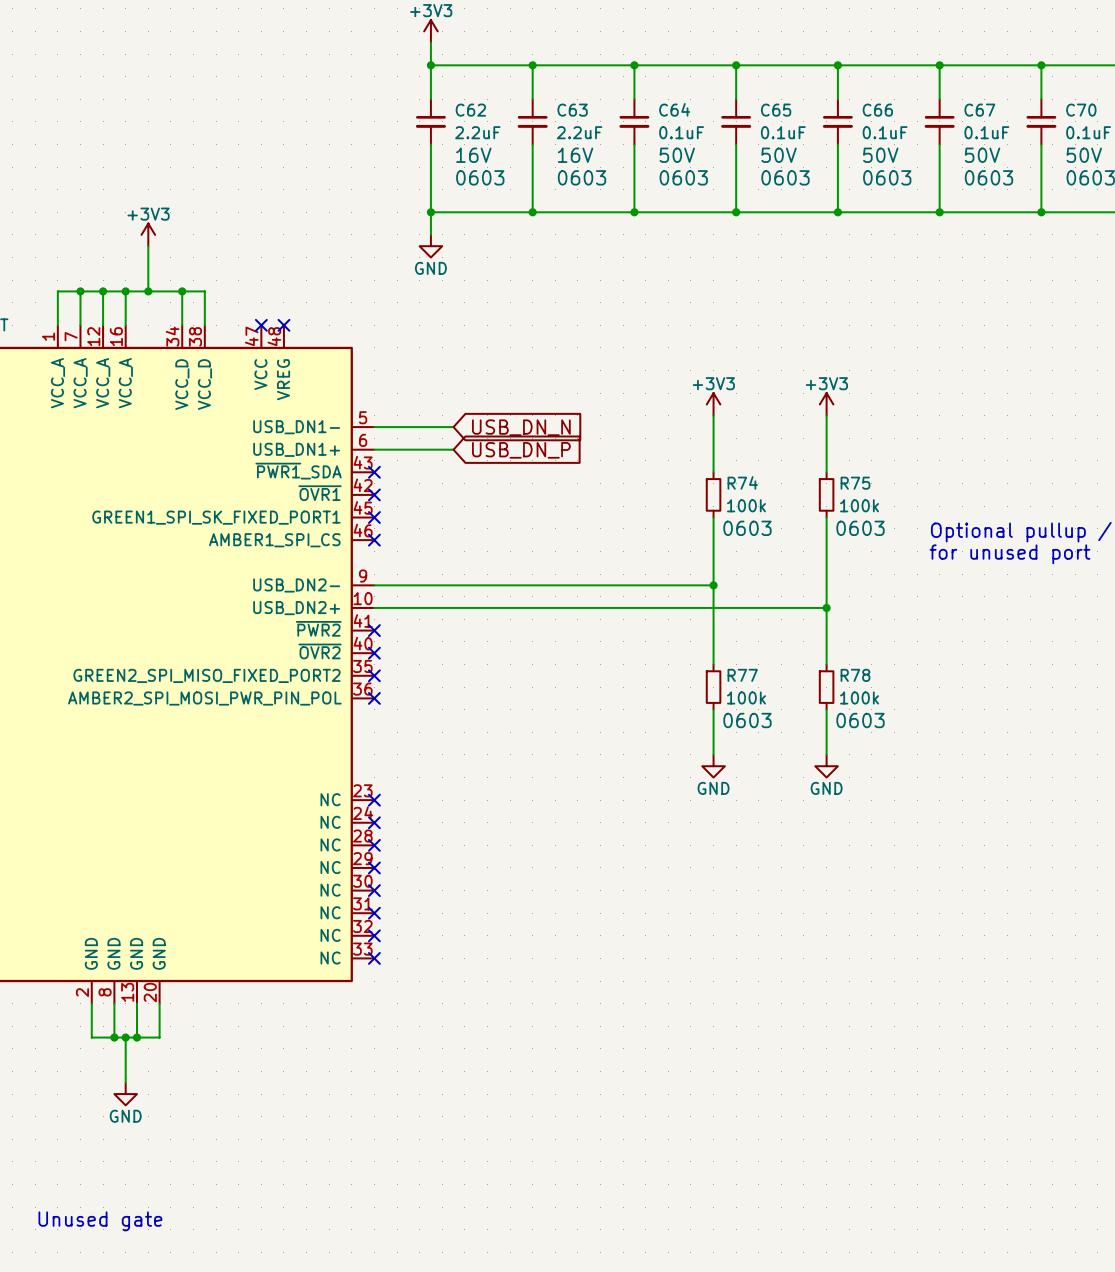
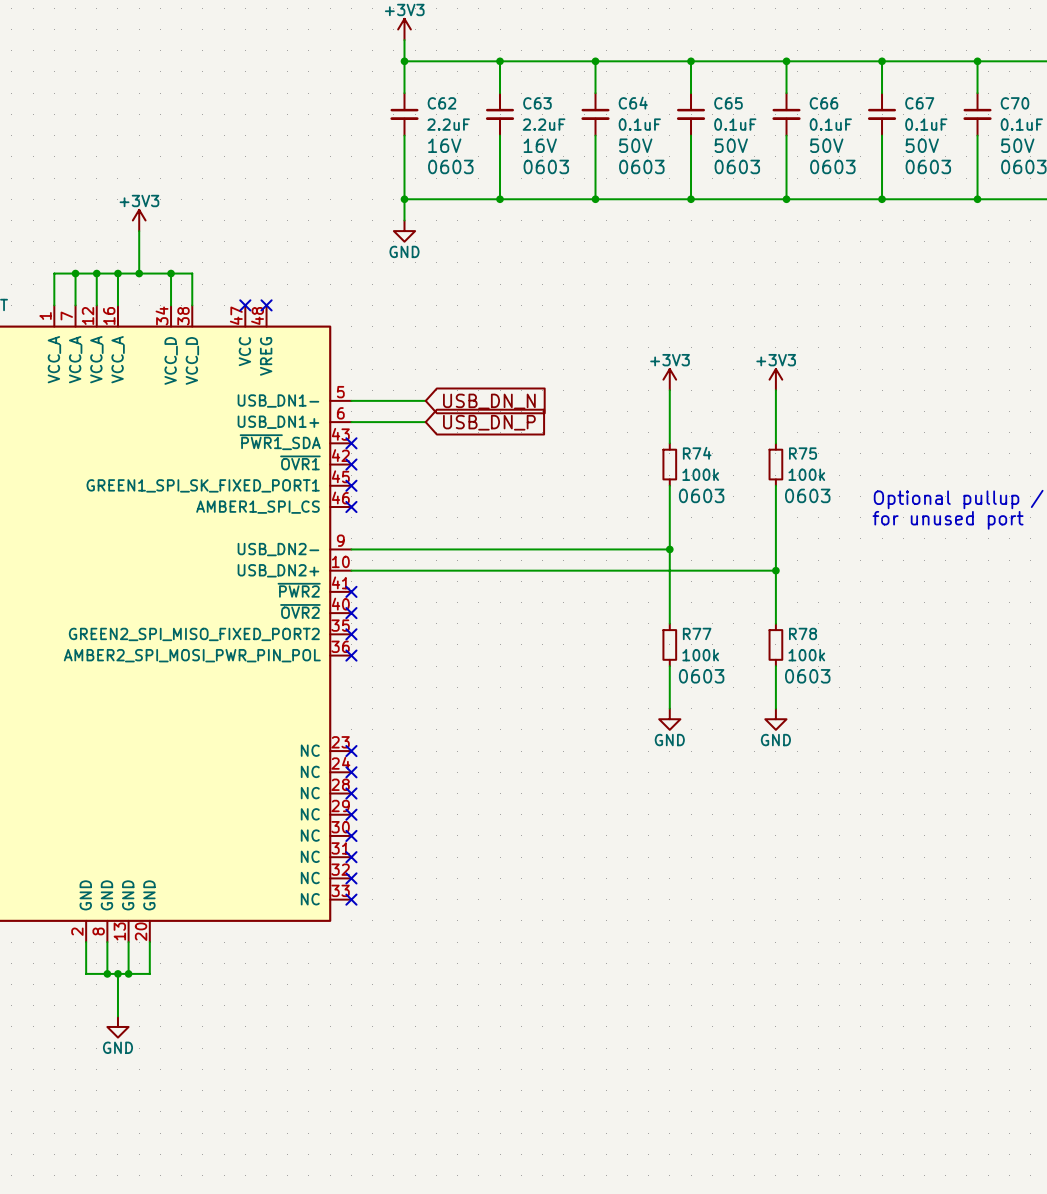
text: Unused gate (100, 1221) -> none

